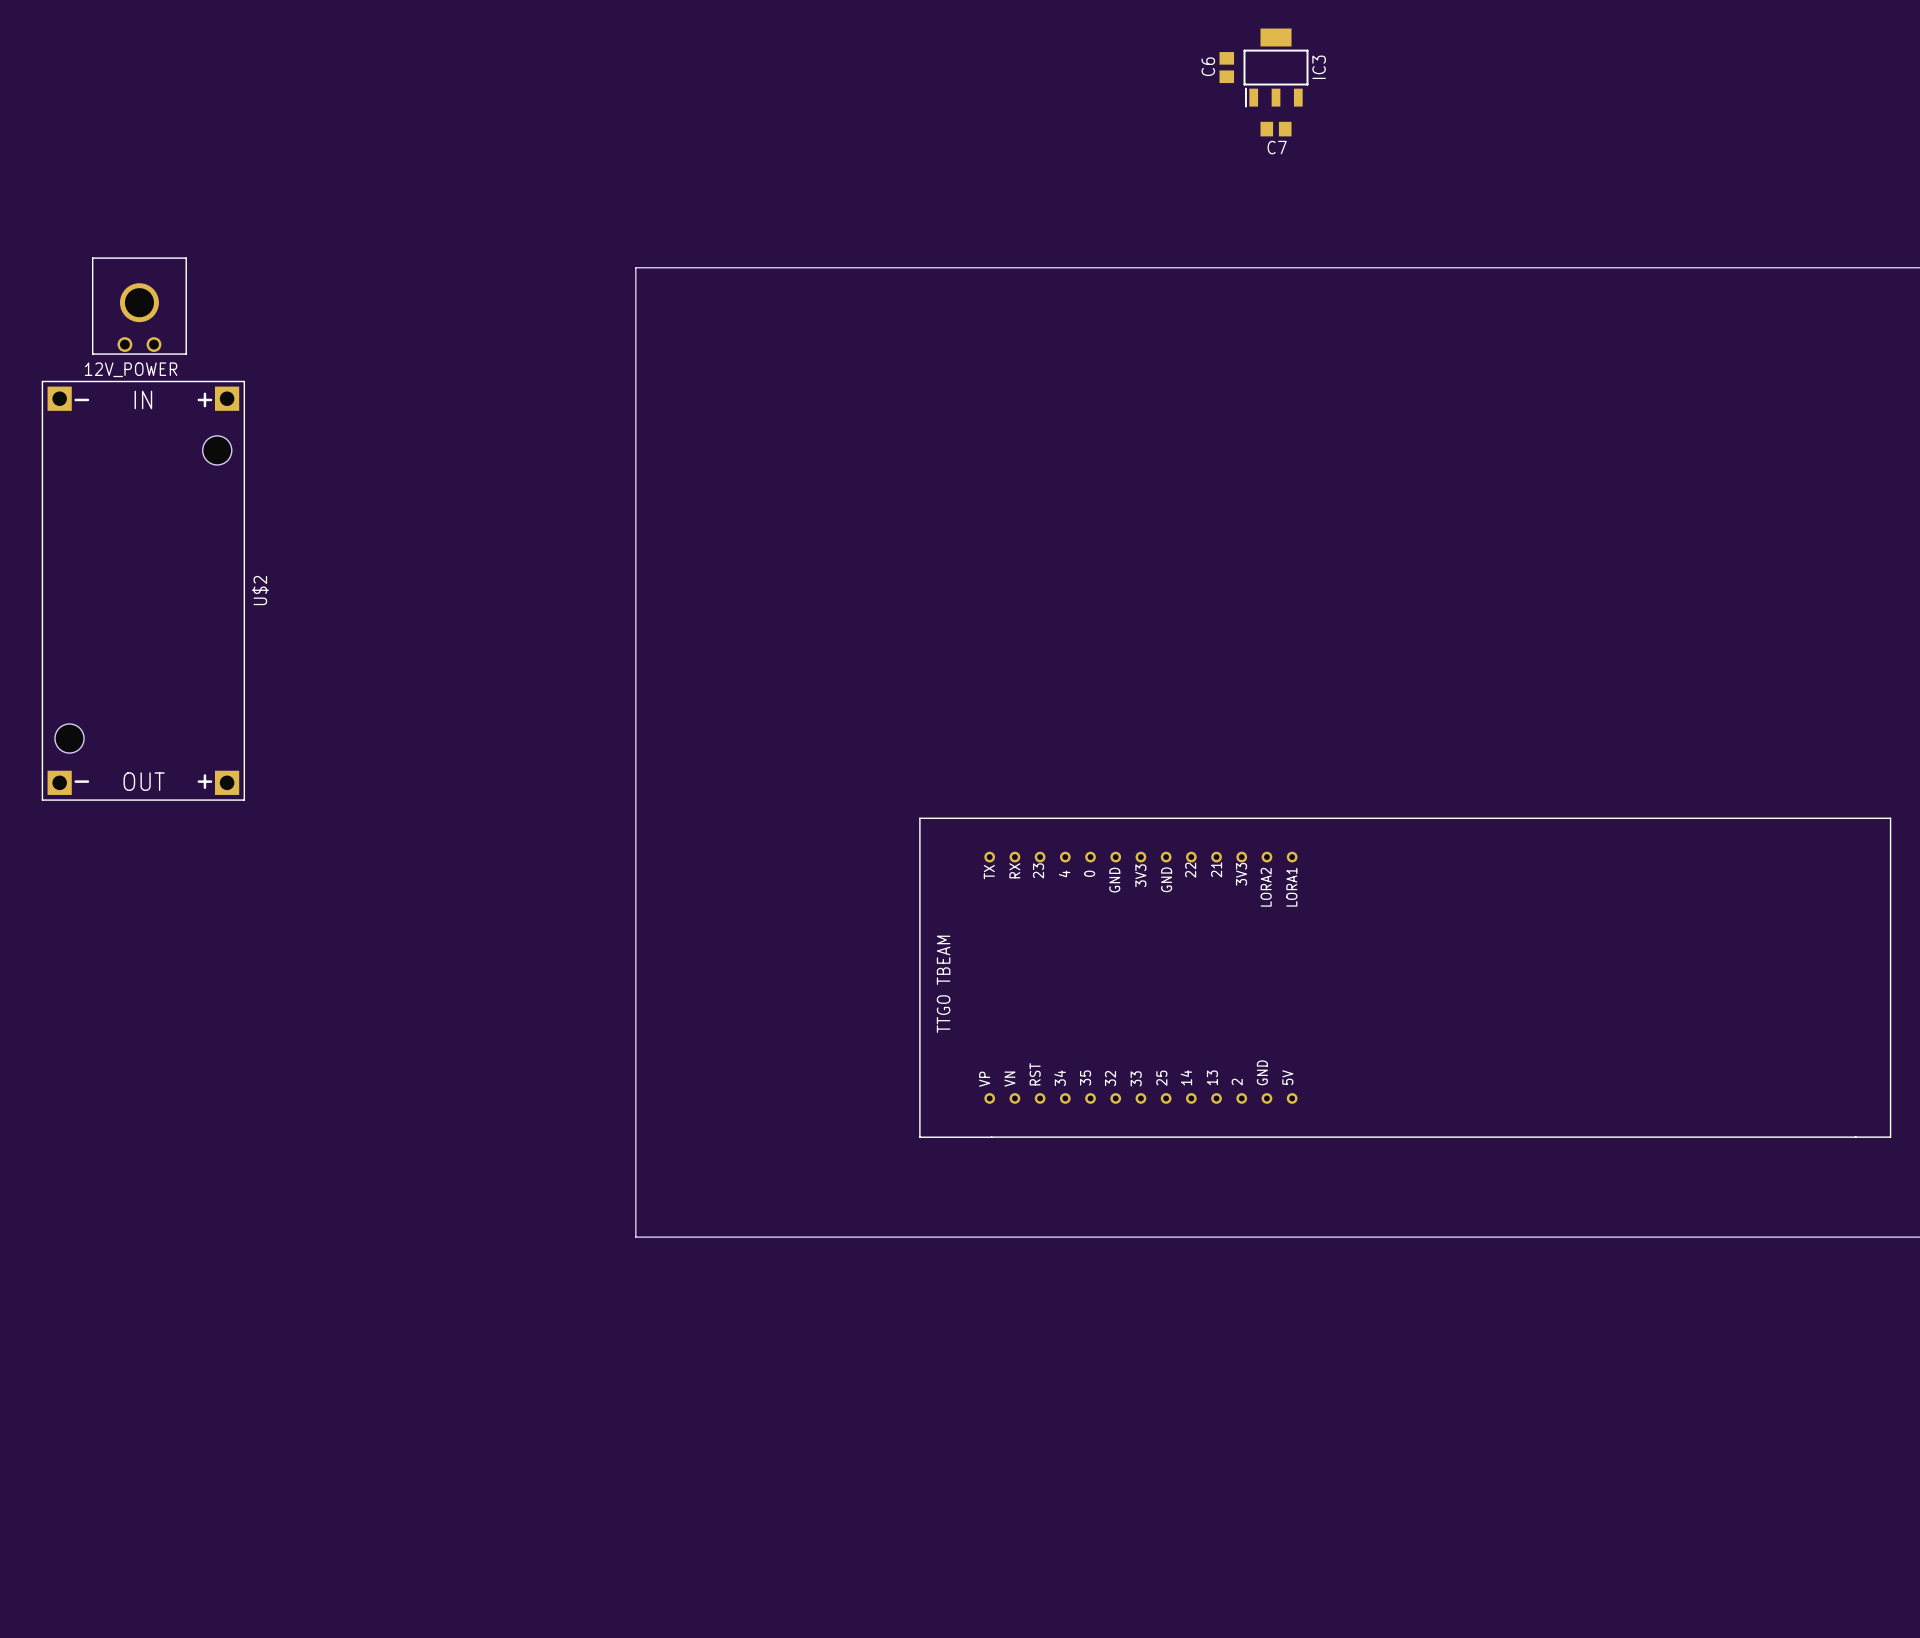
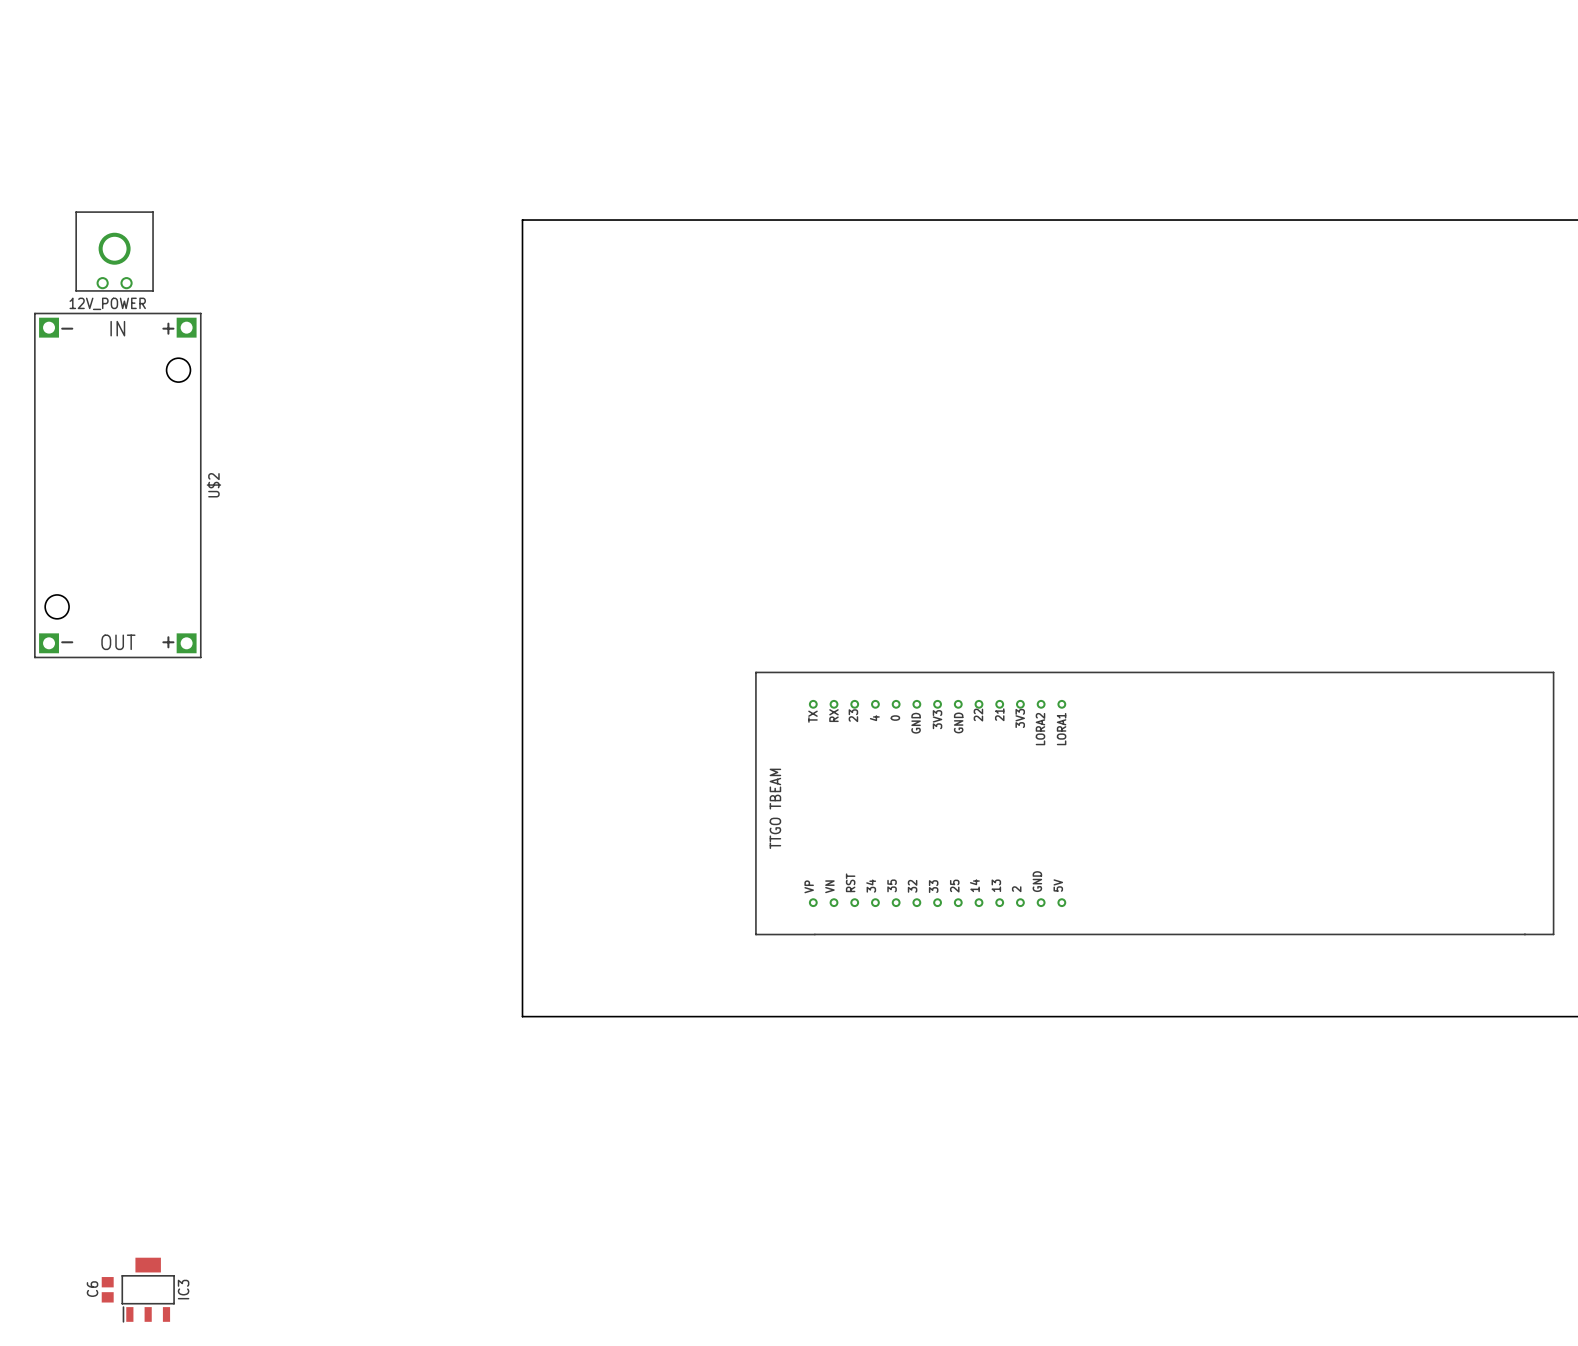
C6 position: (1226, 67) -> (107, 1289)
IC3 position: (1276, 68) -> (148, 1290)
C7: (1276, 129) -> none

